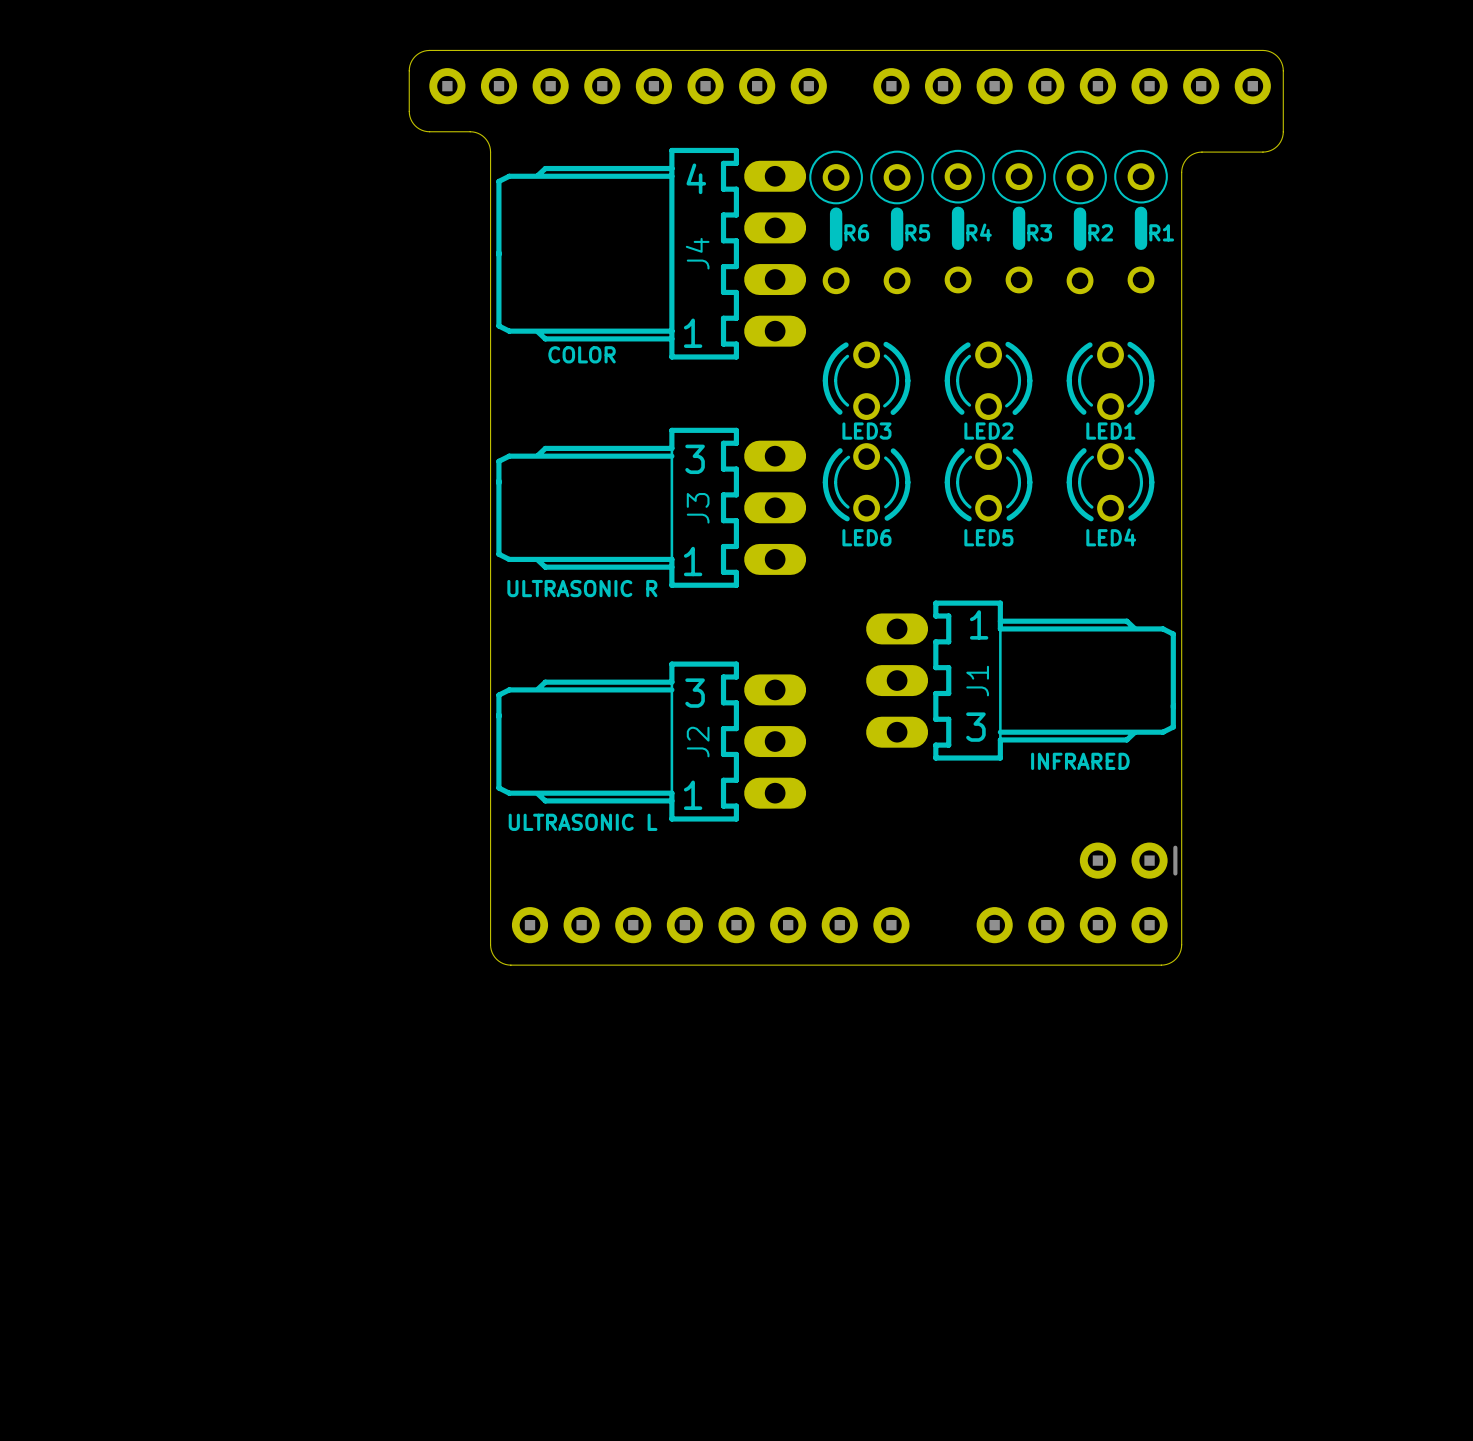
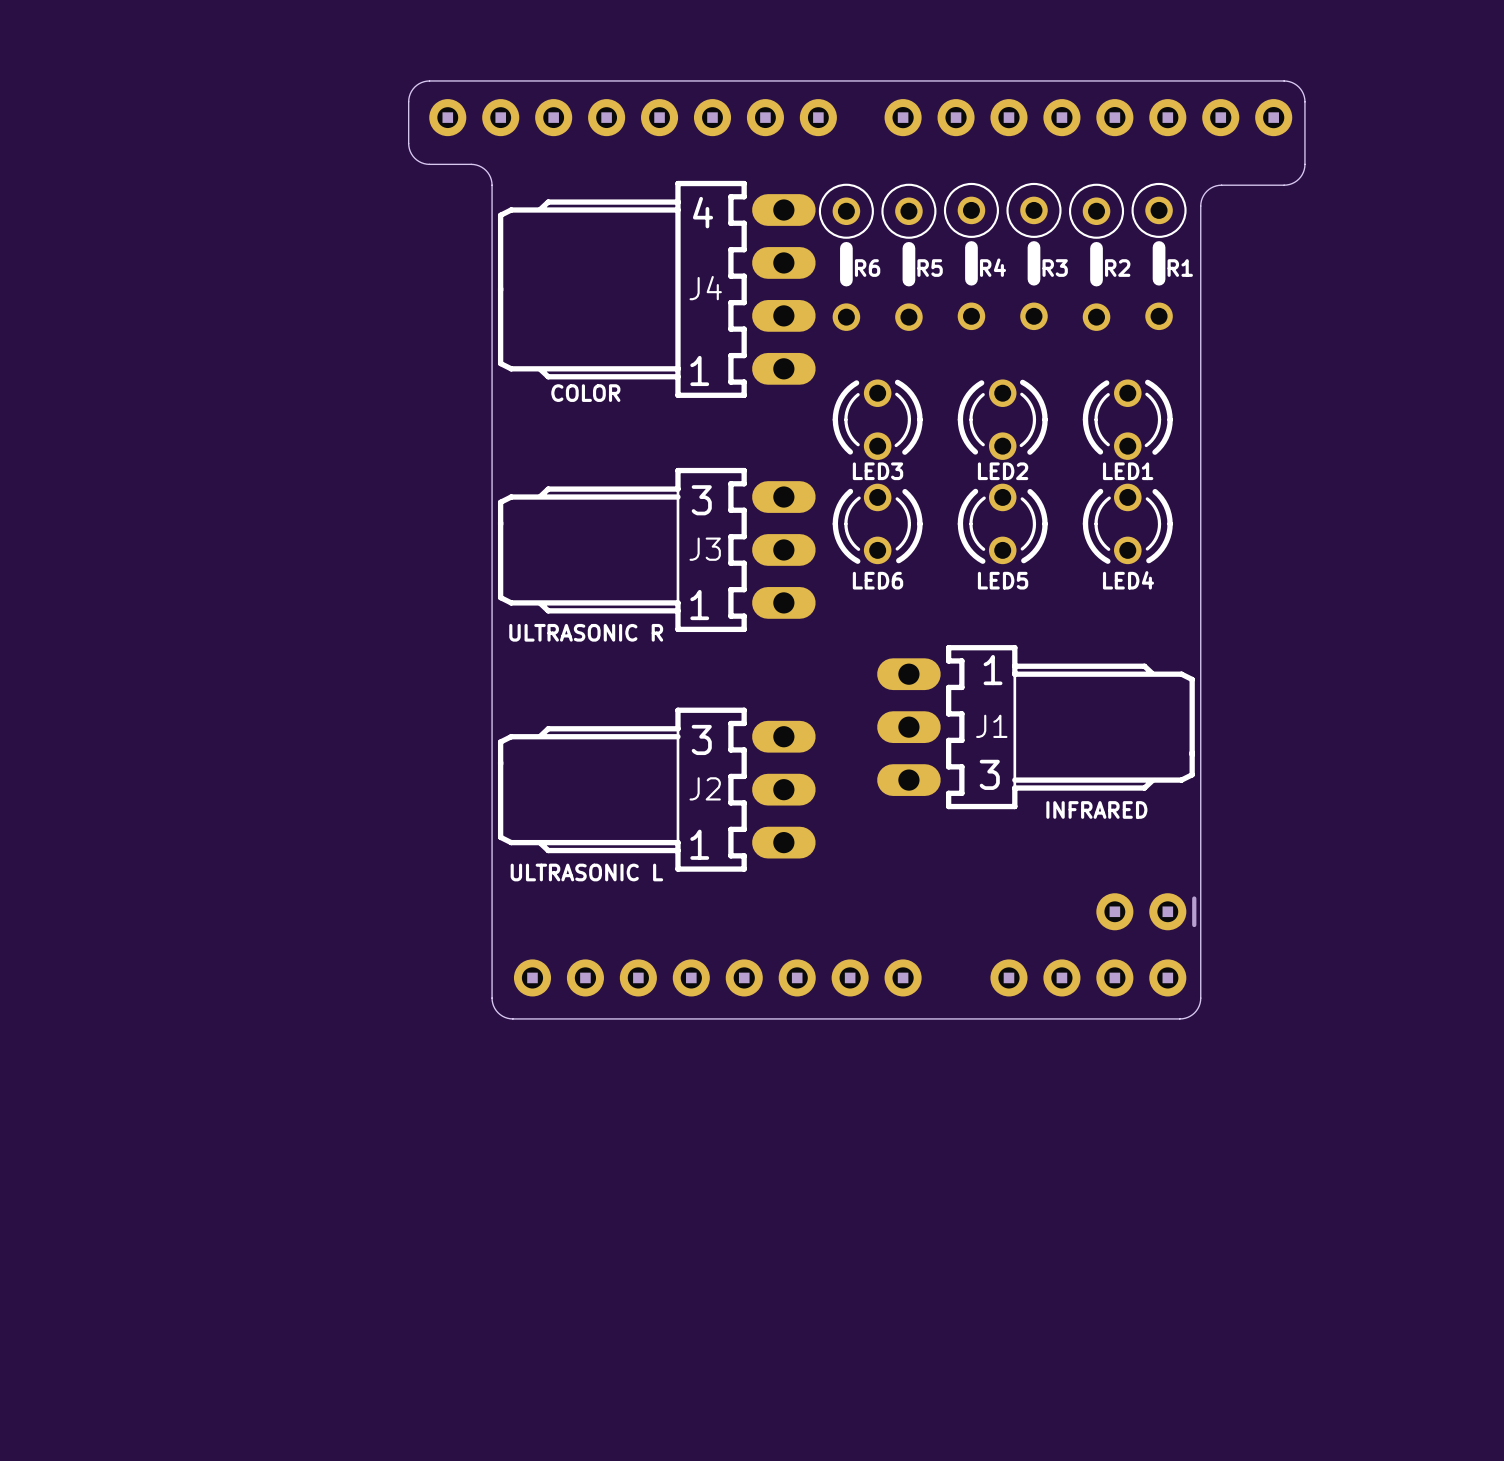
J4 name rotation: 0° (697, 253) -> 90° clockwise (705, 288)
J3 name rotation: 0° (698, 508) -> 90° clockwise (705, 549)
J1 name rotation: 0° (977, 681) -> 90° clockwise (991, 726)
J2 name rotation: 0° (698, 742) -> 90° clockwise (705, 788)

